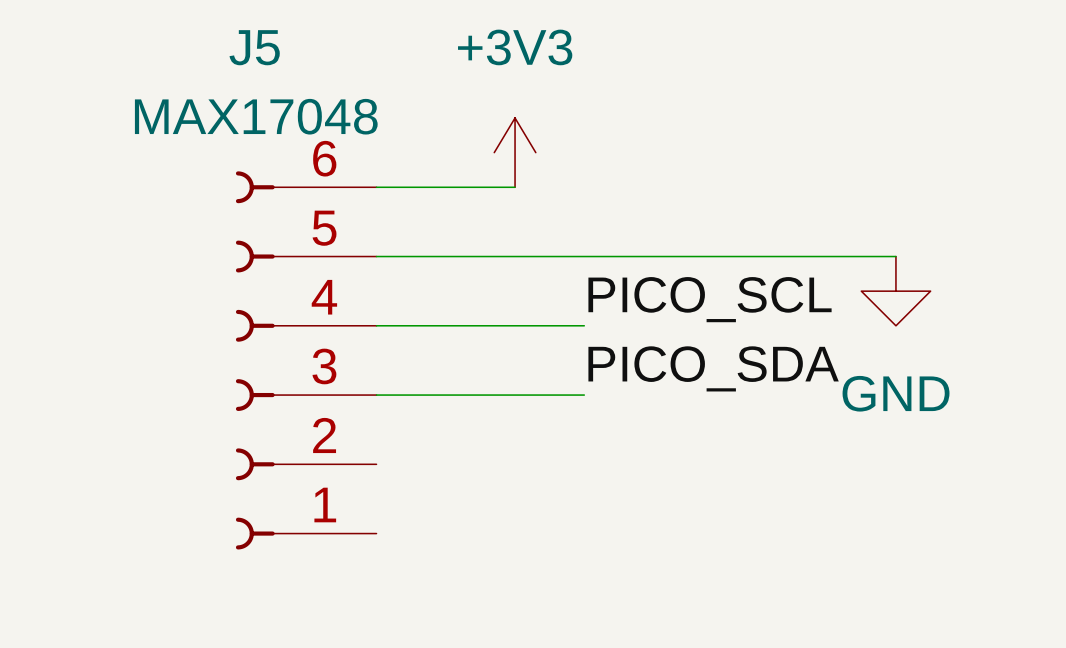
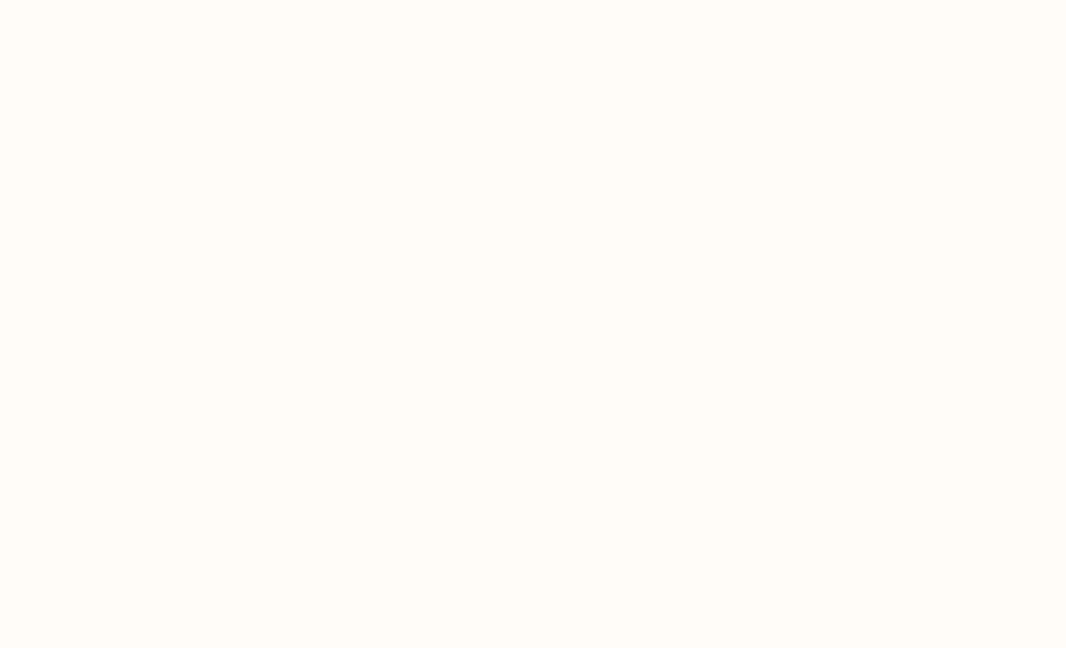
power symbol: +3V3 (515, 152) -> none
wire: (376, 187) (515, 187) -> none
wire: (376, 256) (895, 256) -> none
power symbol: GND (895, 291) -> none
label: PICO_SCL (710, 299) -> none
wire: (376, 325) (584, 325) -> none
J5: MAX17048 (306, 360) -> none
label: PICO_SDA (713, 368) -> none
wire: (376, 395) (584, 395) -> none

